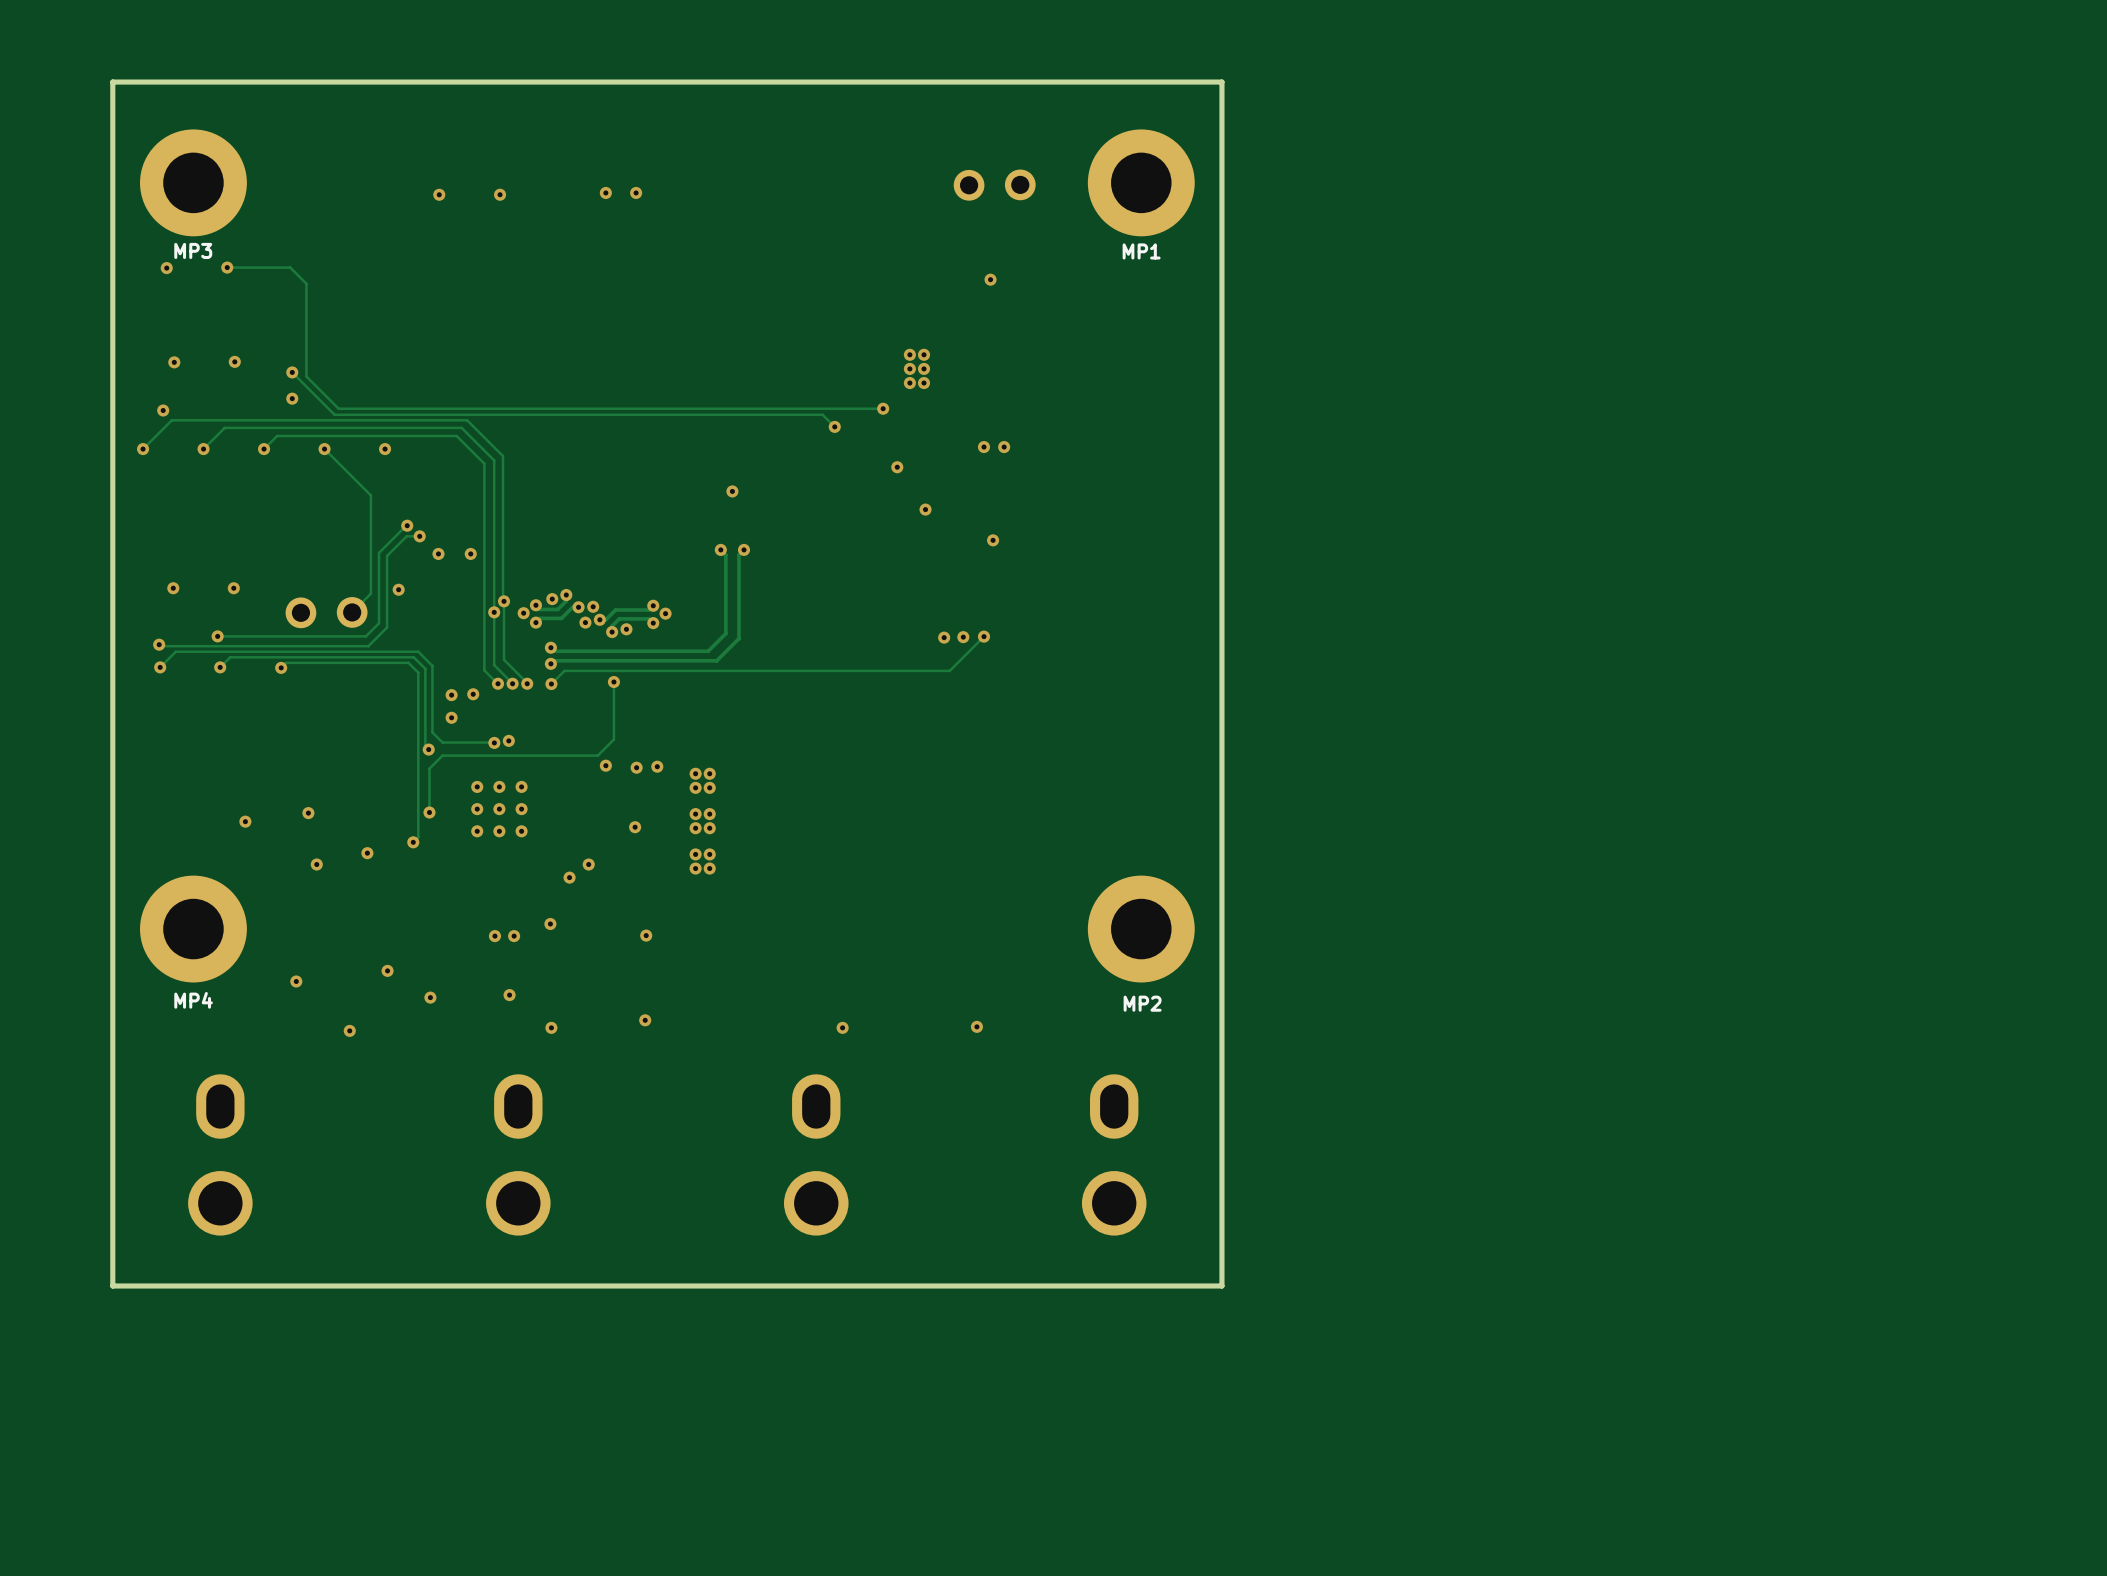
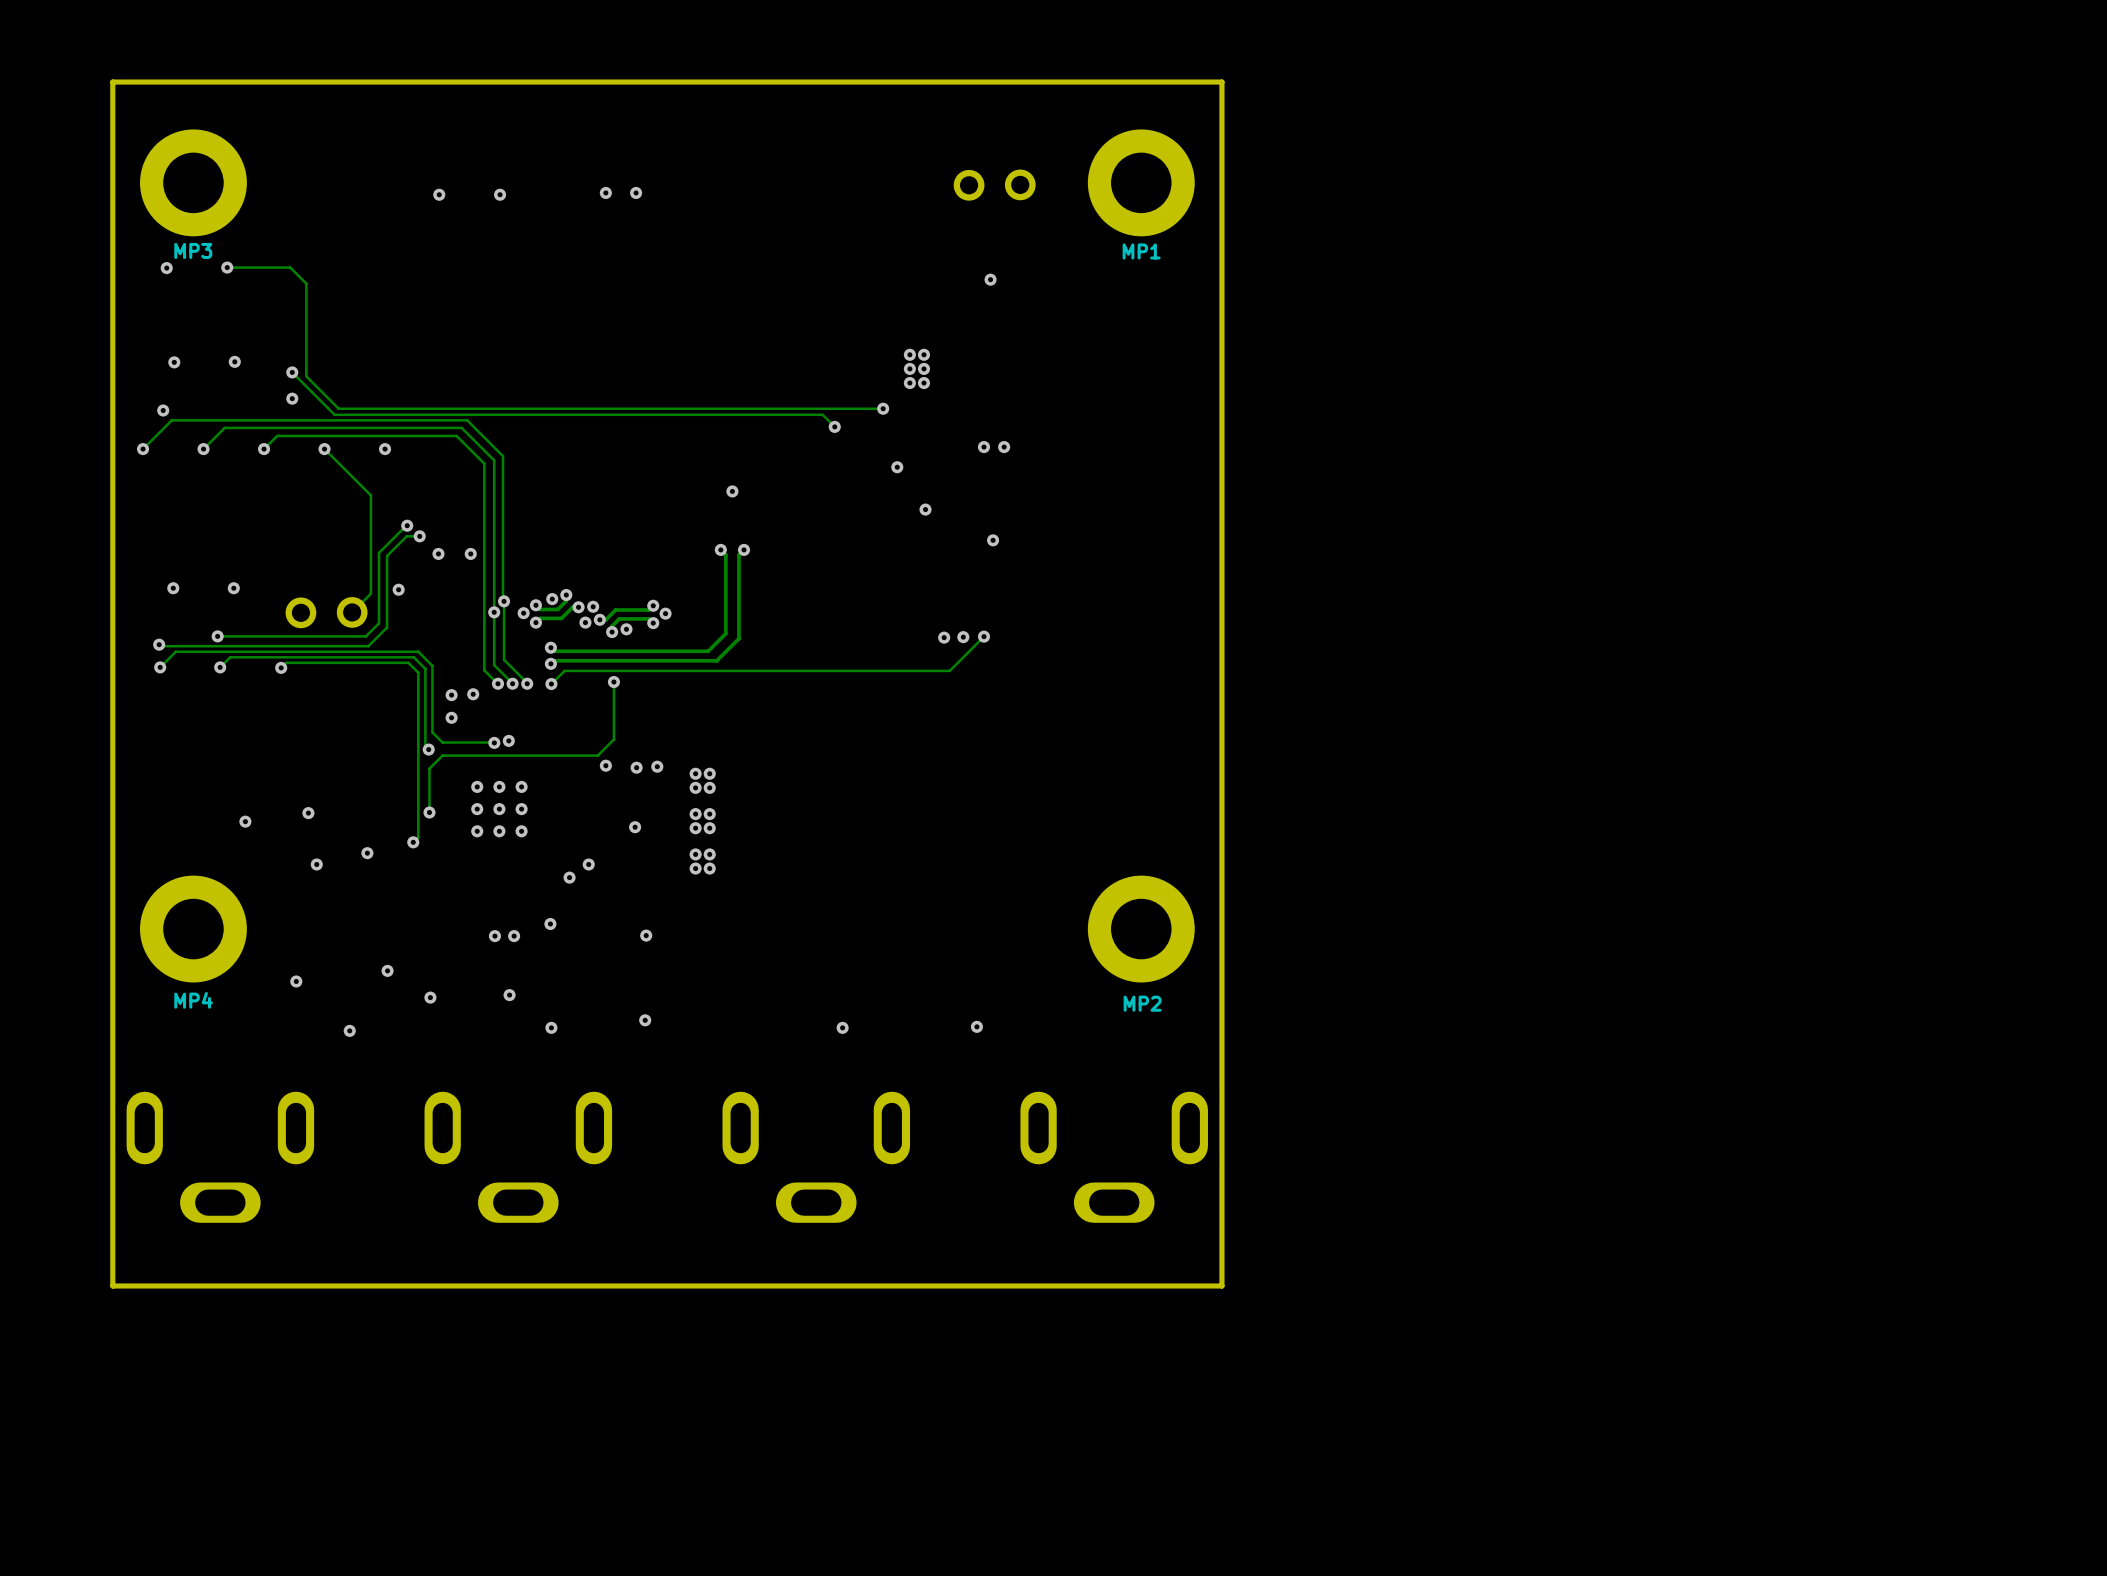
part footprint: [188, 1074, 253, 1236] -> [126, 1091, 315, 1223]
part footprint: [486, 1074, 551, 1236] -> [424, 1091, 613, 1223]
part footprint: [783, 1074, 849, 1236] -> [722, 1091, 911, 1223]
part footprint: [1081, 1074, 1147, 1236] -> [1020, 1091, 1208, 1223]

